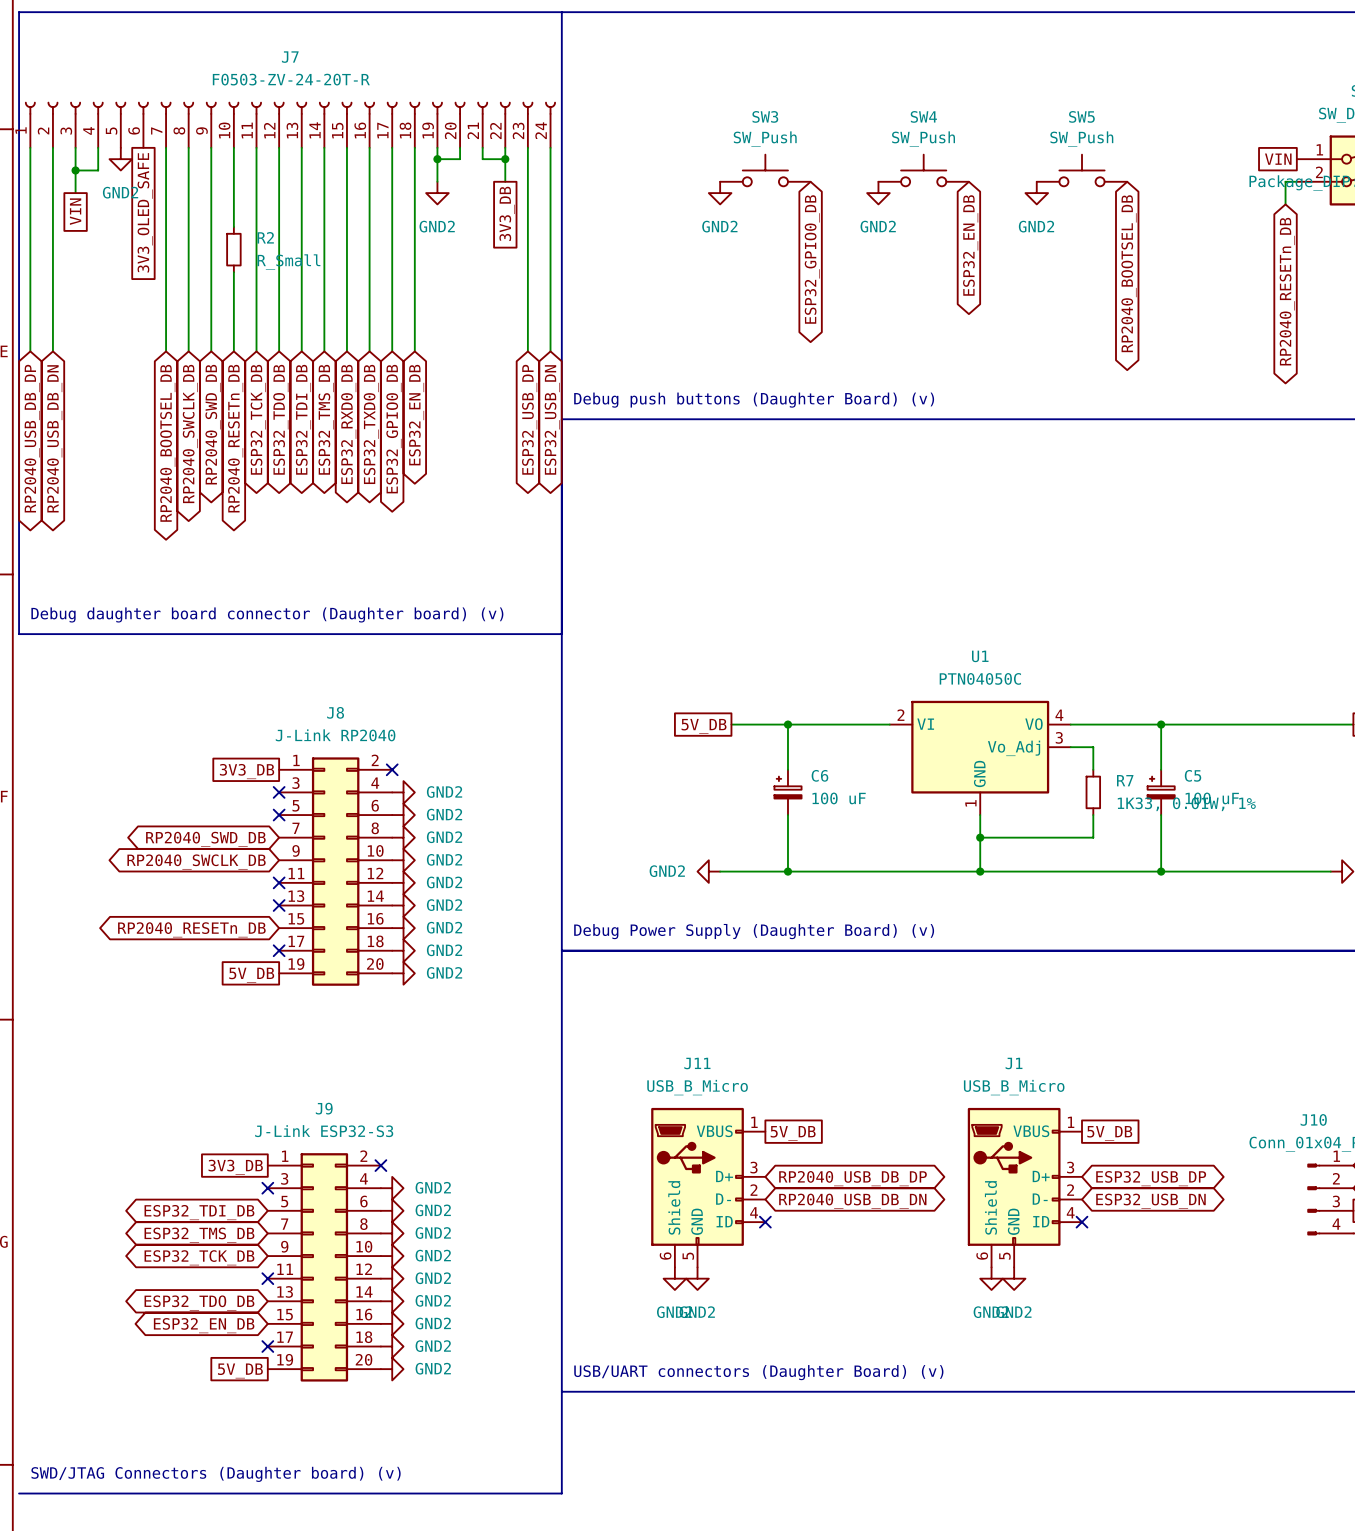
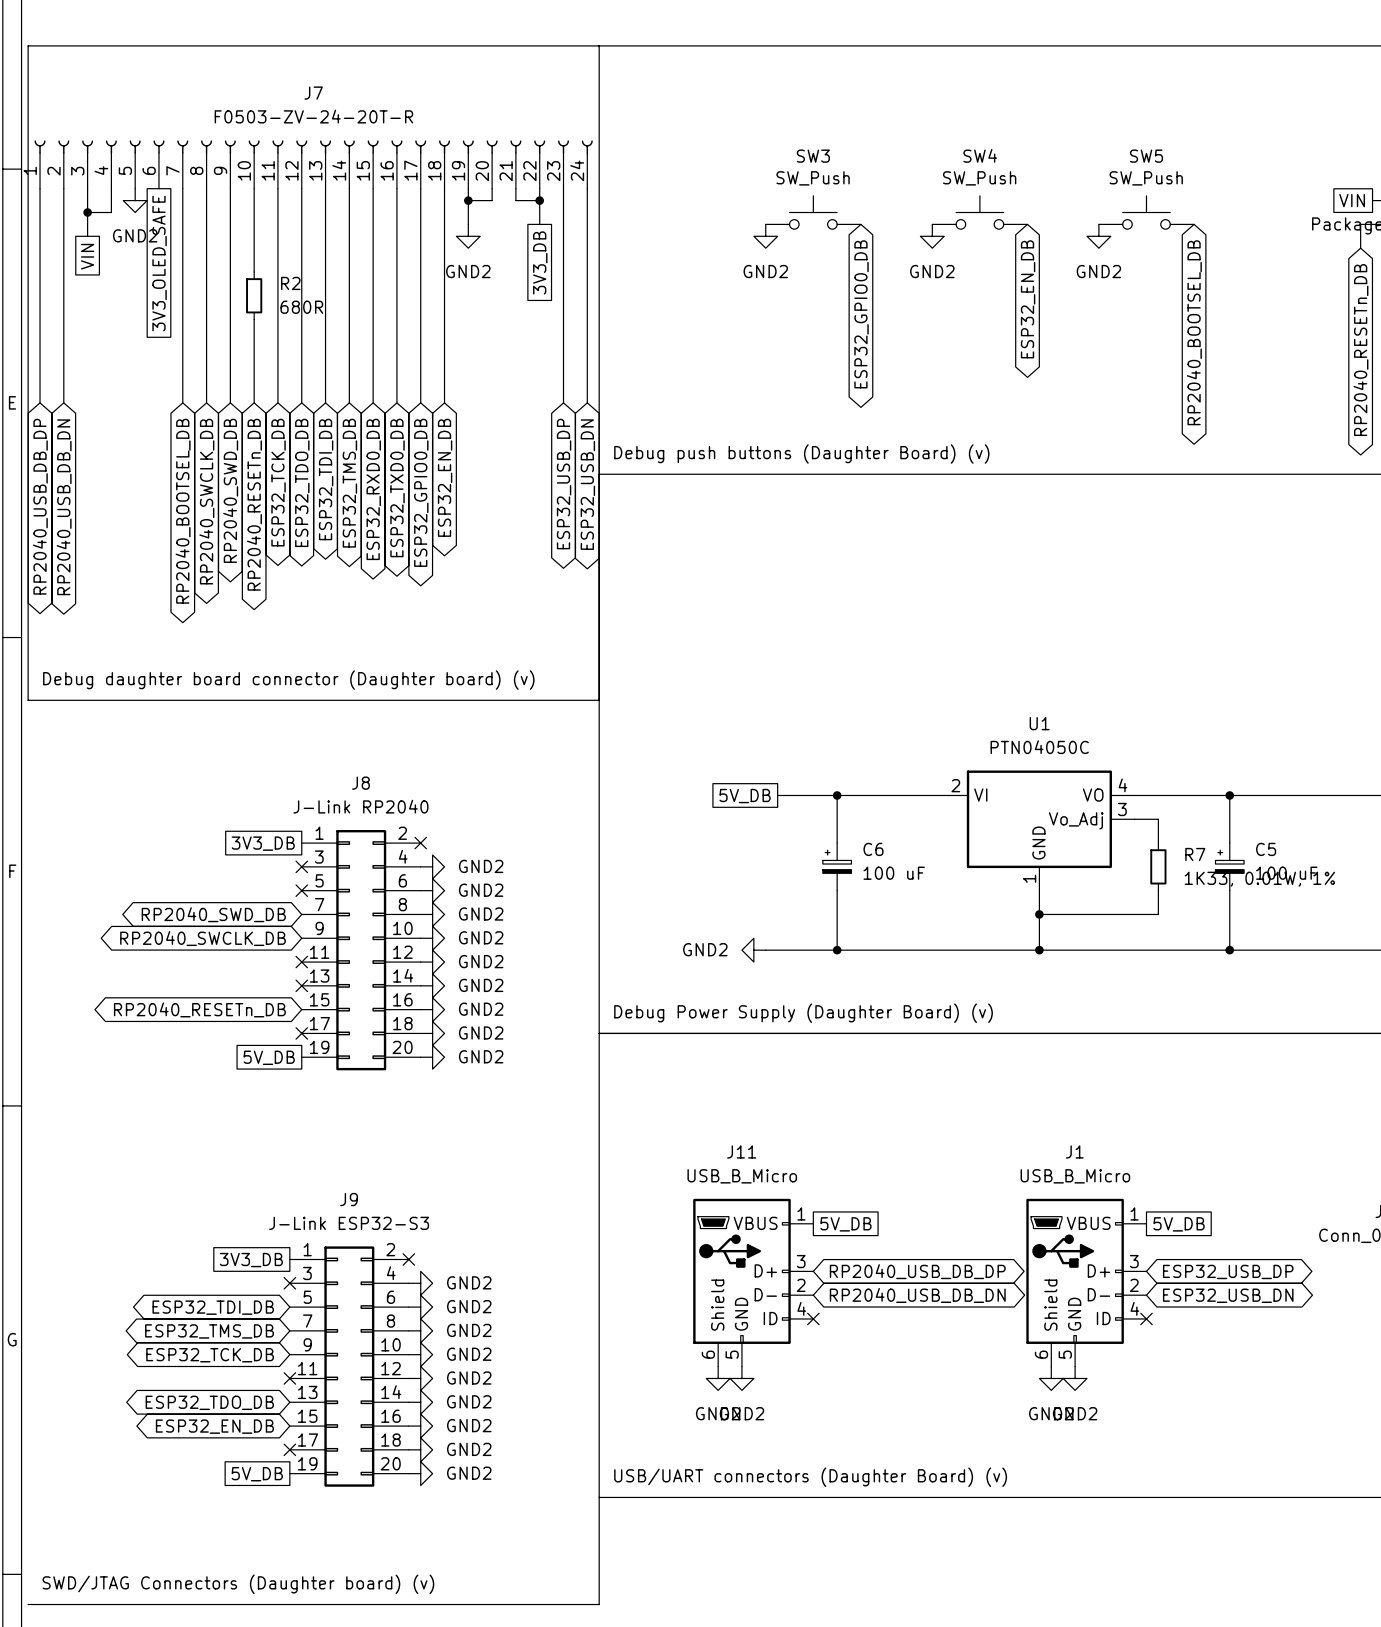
R2 value: R_Small (288, 262) -> 680R (301, 307)

